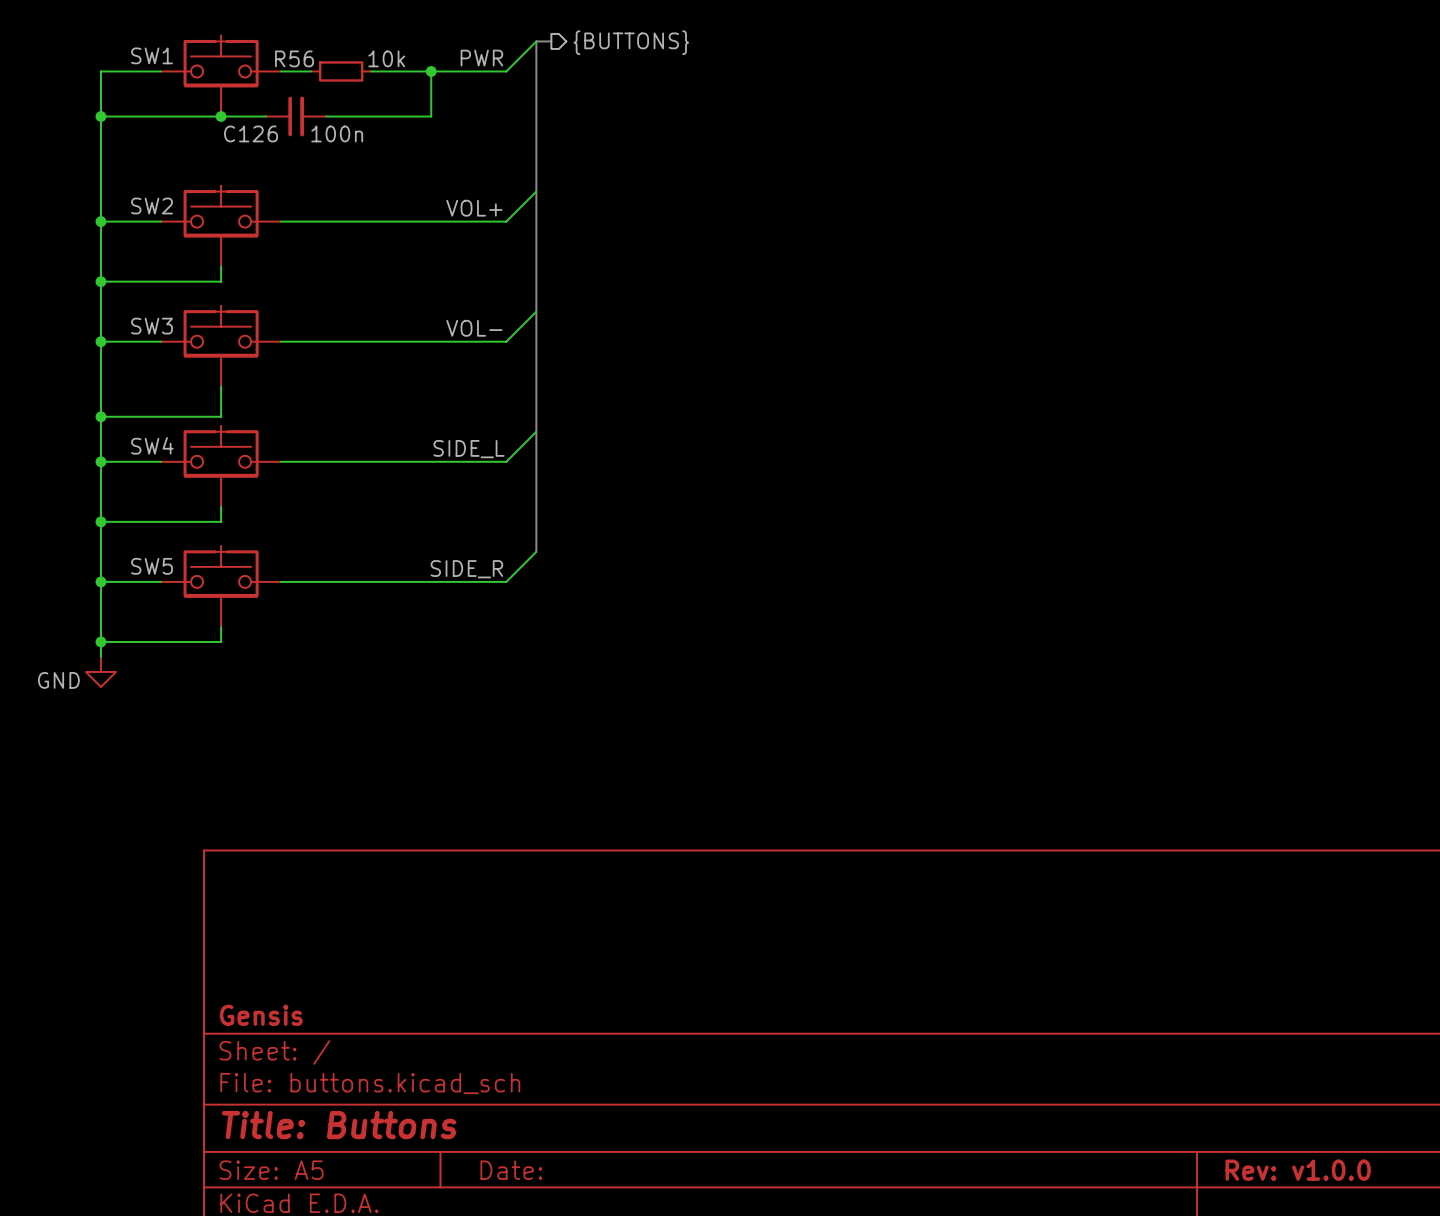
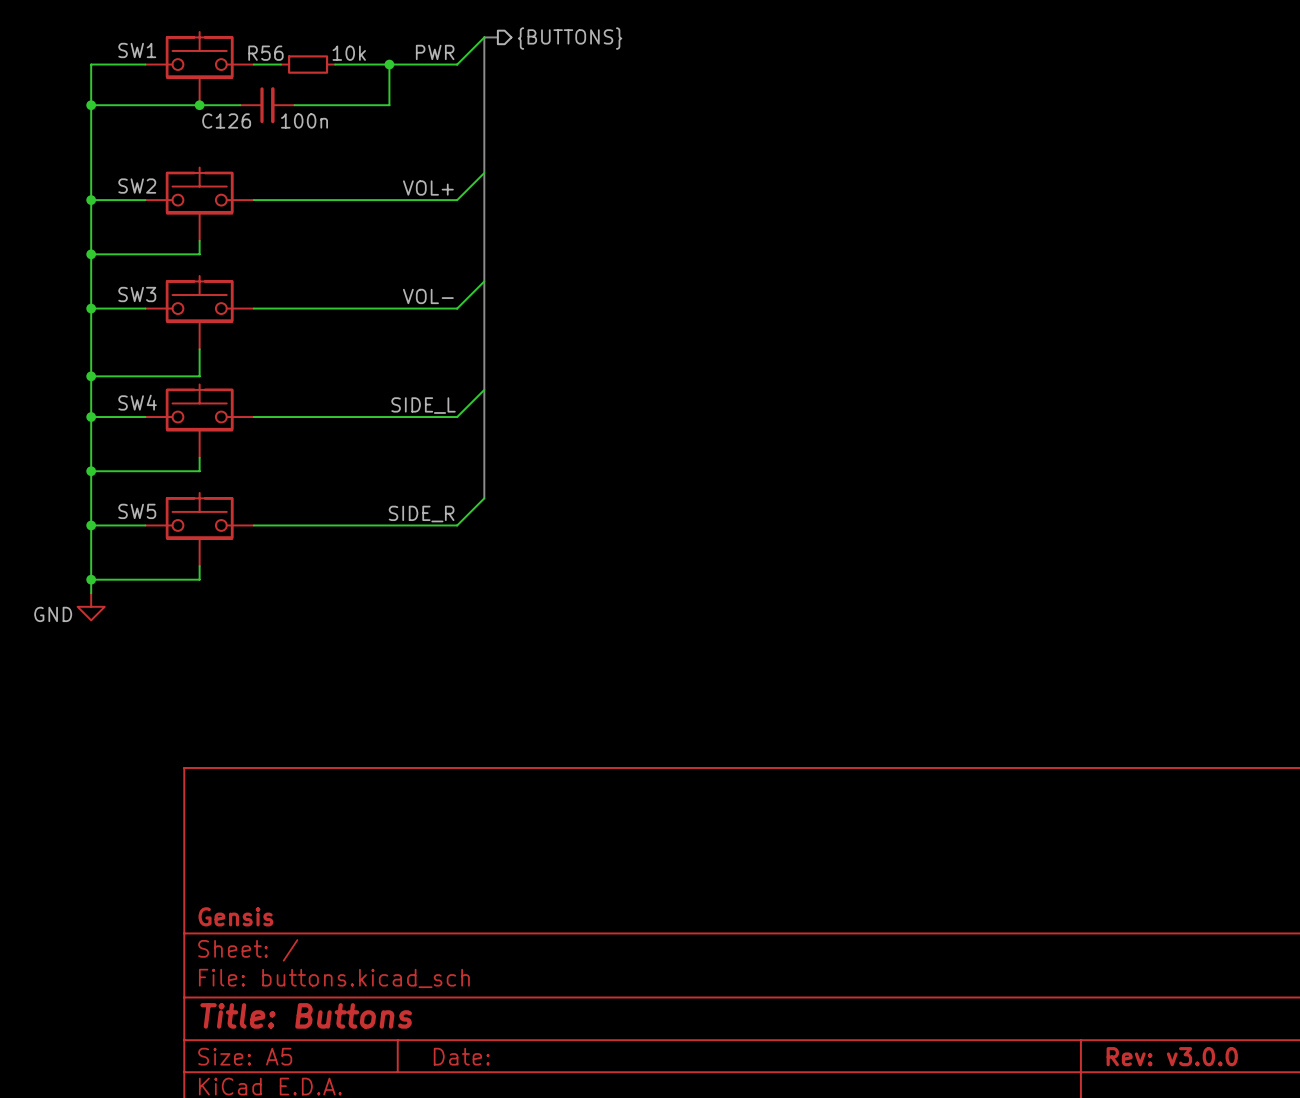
title block: Rev: v1.0.0 (1298, 1170) -> Rev: v3.0.0 (1172, 1056)

